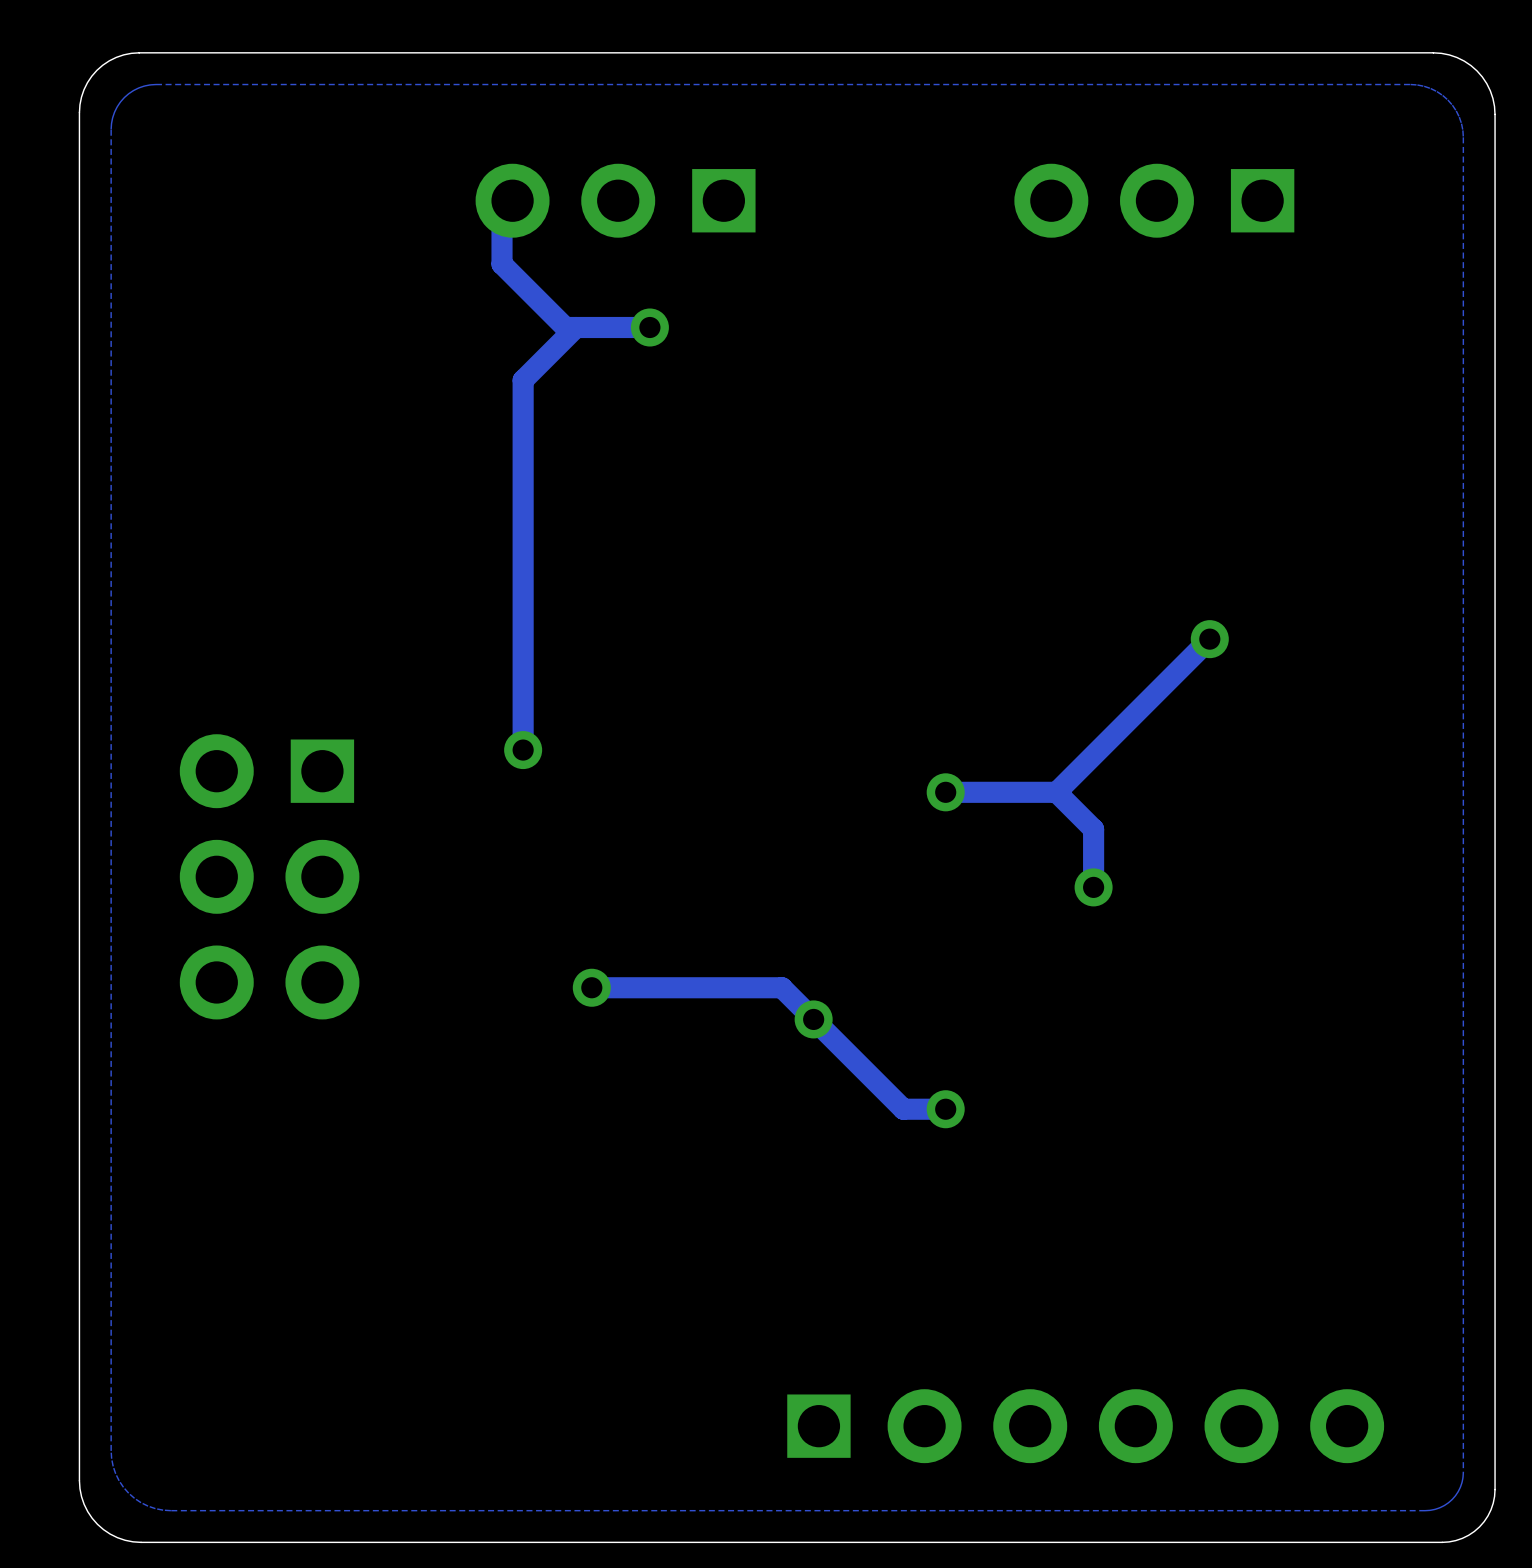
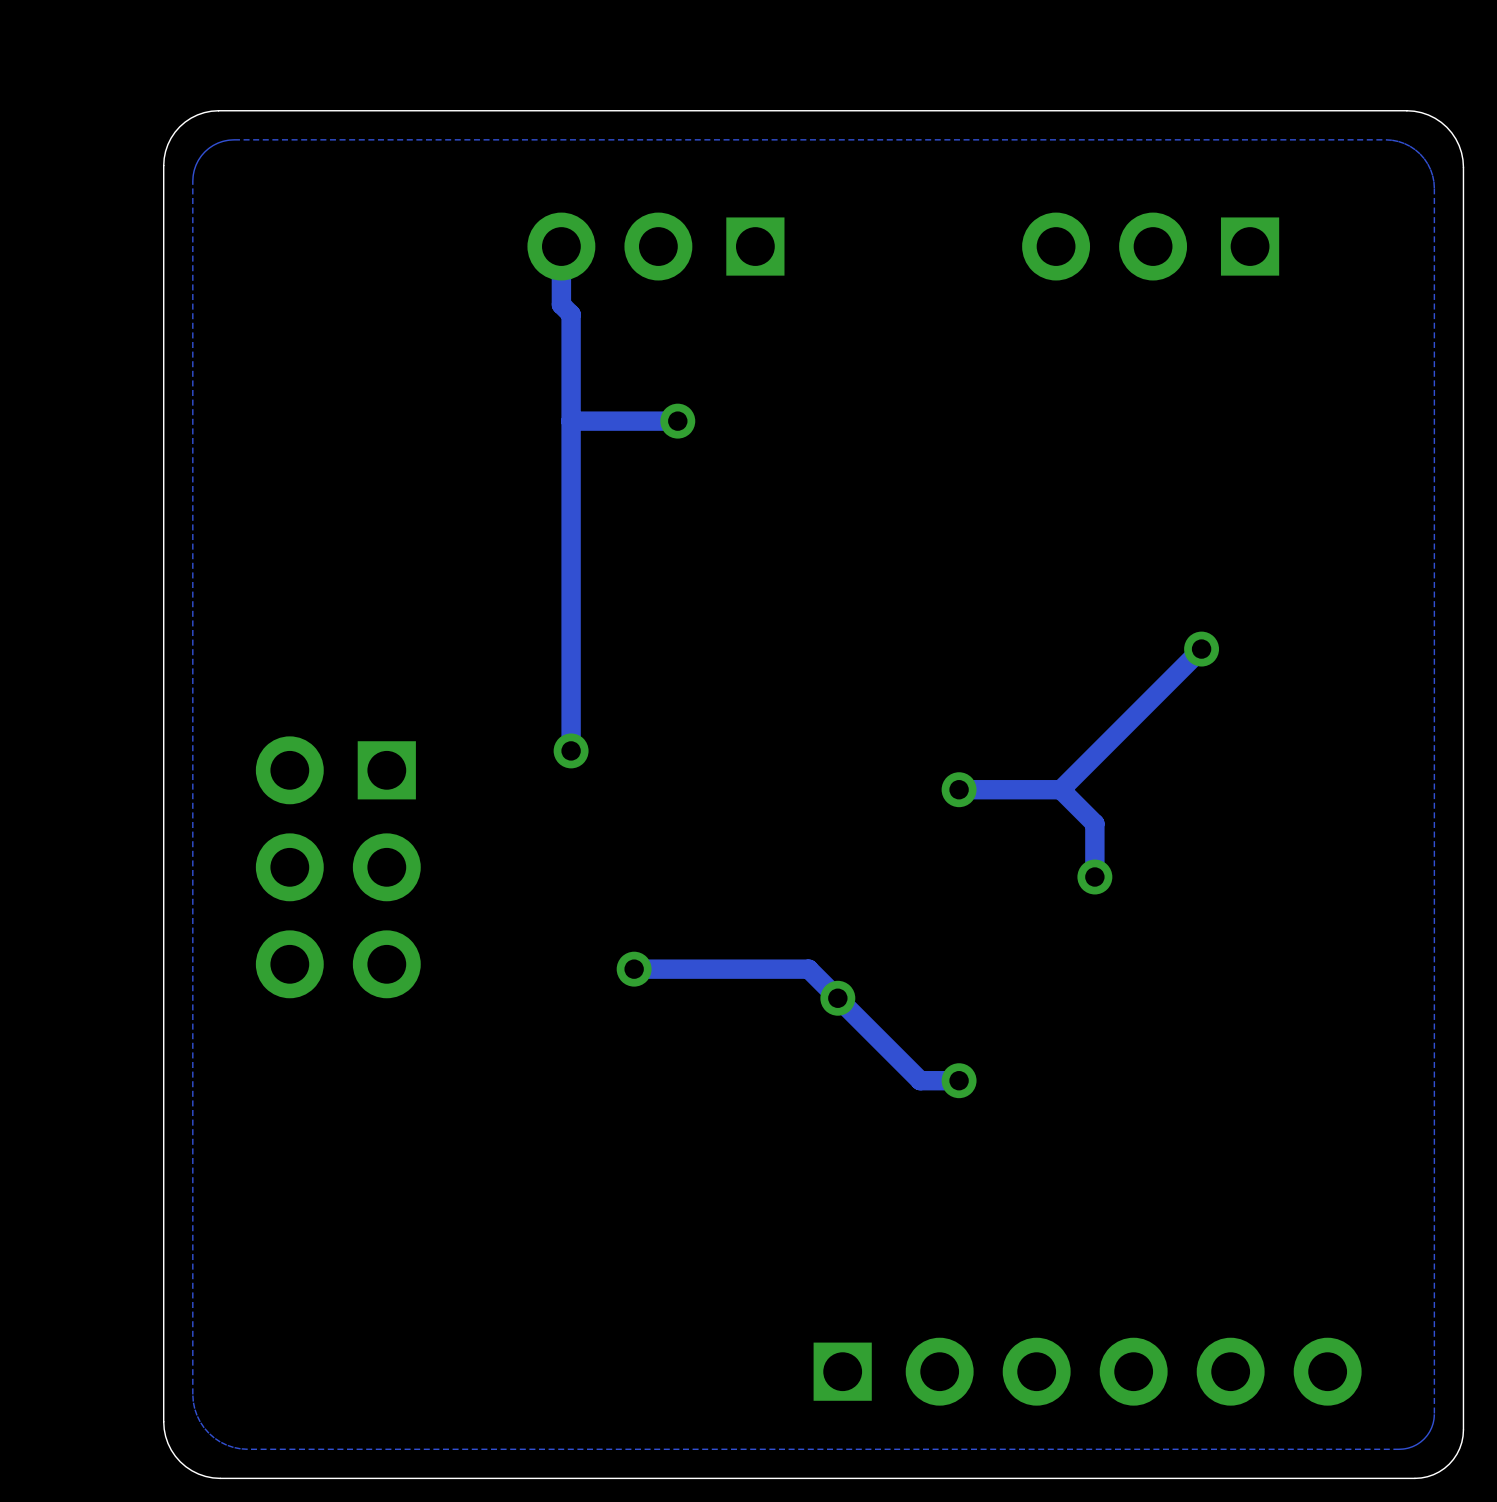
track: (512, 200) (502, 211) (502, 264) (565, 327) (649, 327) -> (561, 246) (561, 304) (571, 314) (571, 411)
track: (575, 327) (523, 380) -> none
via position: (649, 327) -> (677, 421)
track: none -> (677, 421) (571, 421)

